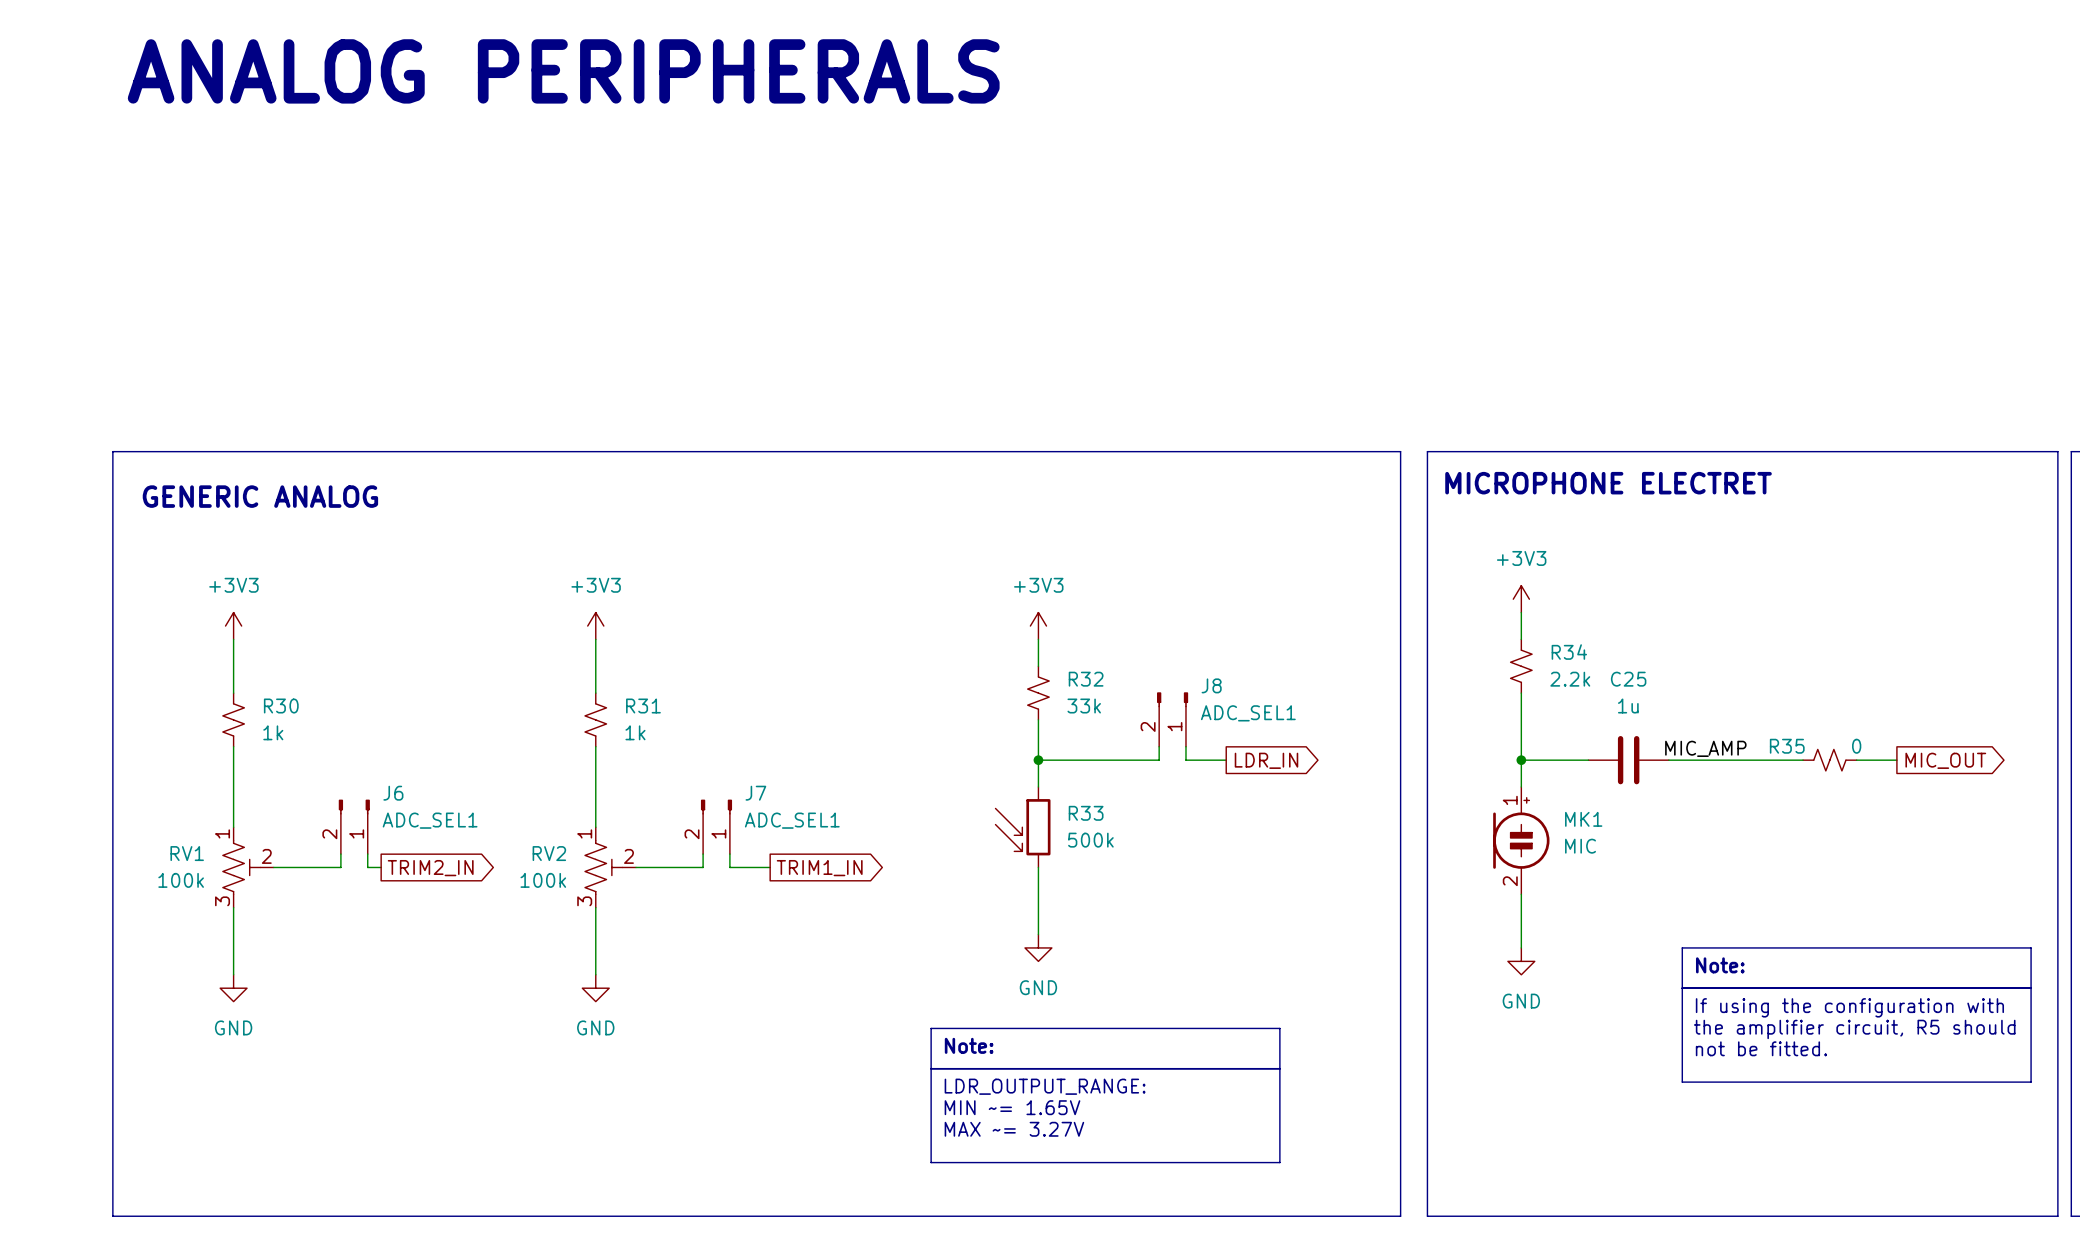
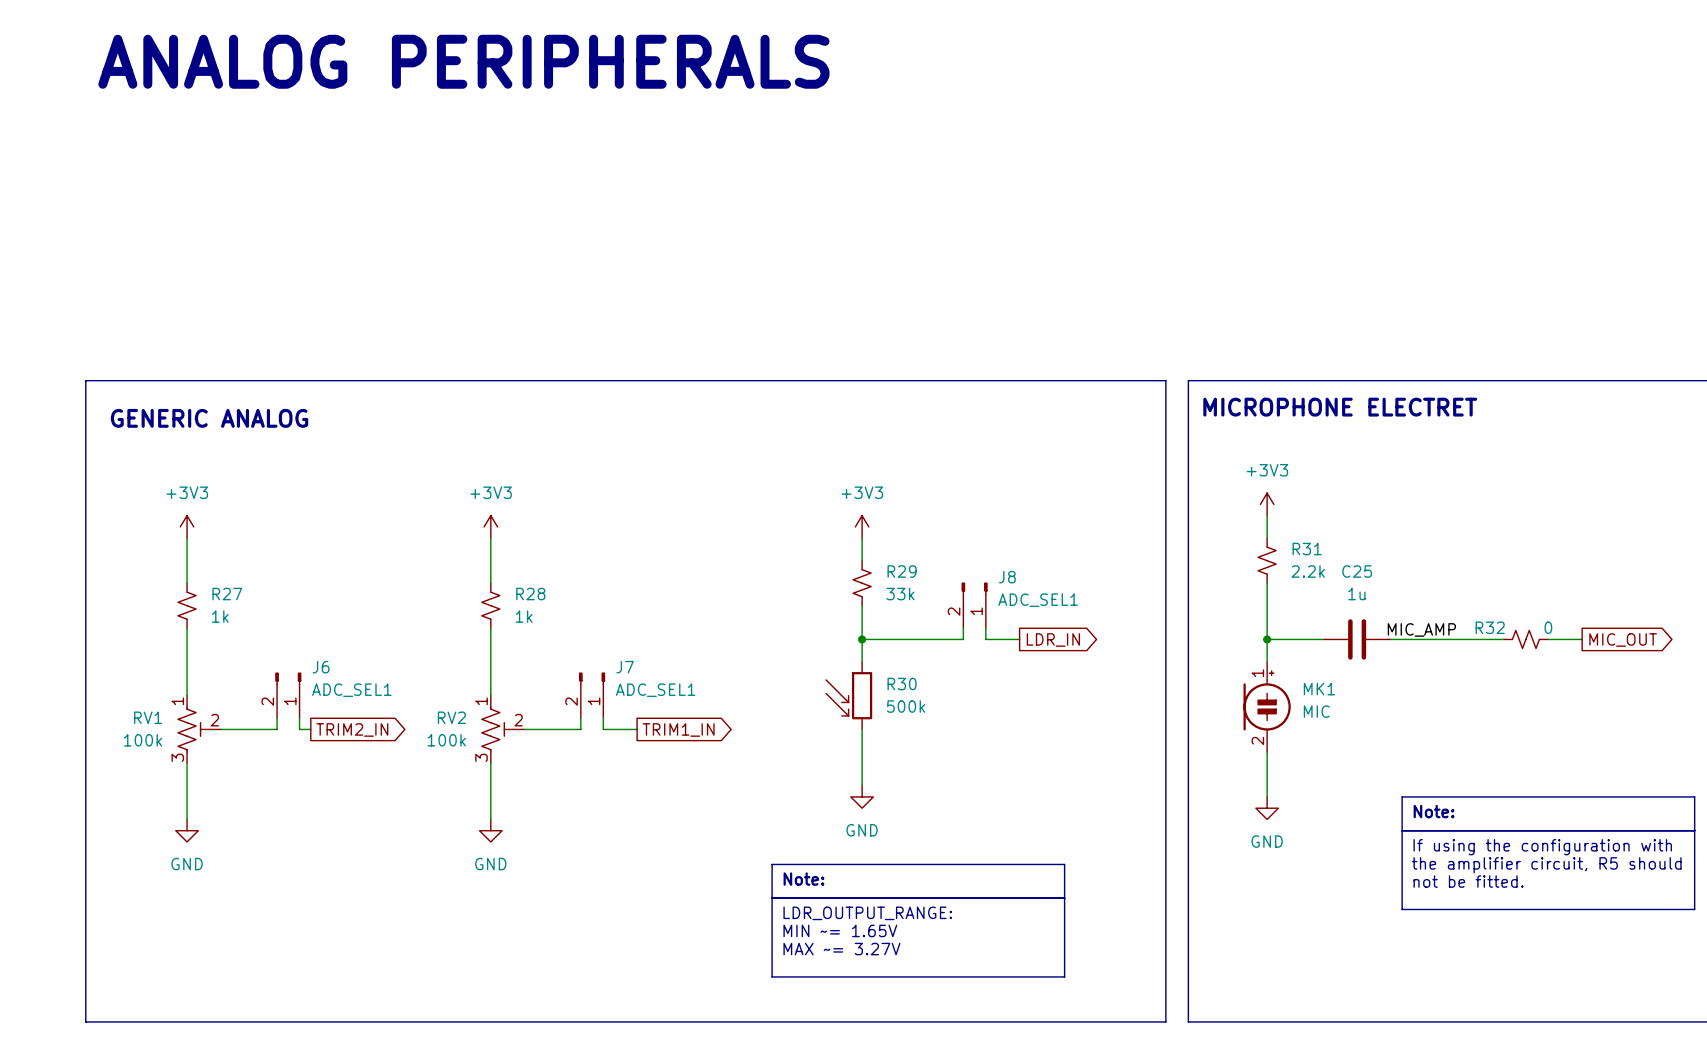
R34 name: R34 (1569, 652) -> R31 (1307, 549)
R32 name: R32 (1086, 679) -> R29 (902, 571)
R30 name: R30 (281, 706) -> R27 (227, 594)
R31 name: R31 (643, 706) -> R28 (530, 594)
R35 name: R35 (1787, 746) -> R32 (1490, 627)
R33 name: R33 (1086, 813) -> R30 (902, 684)

